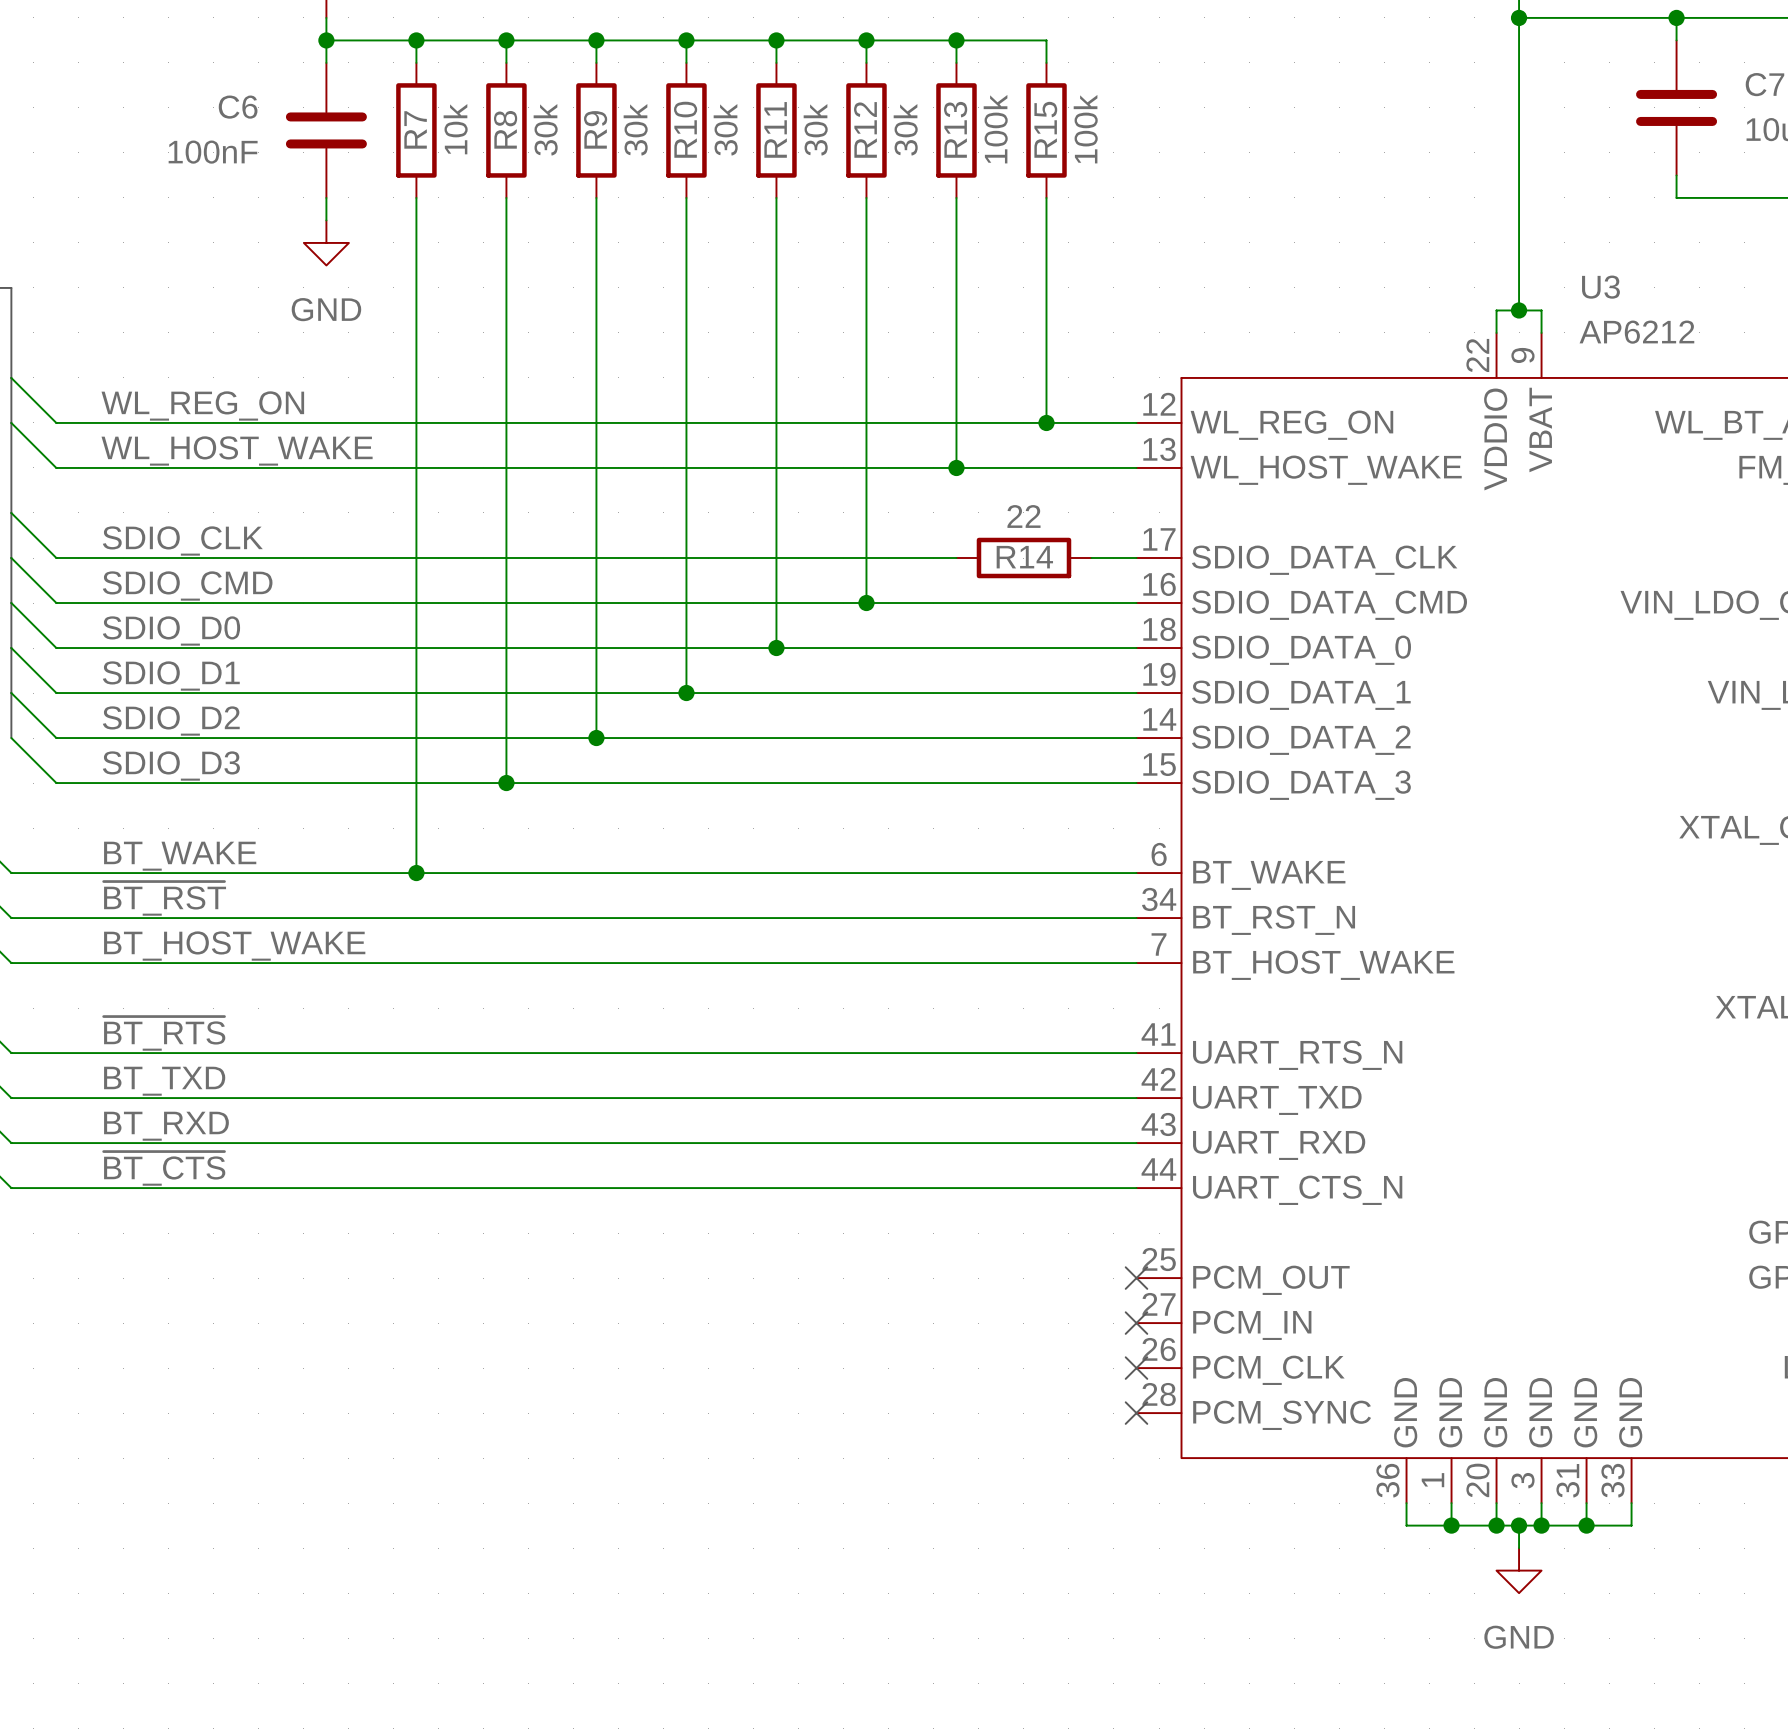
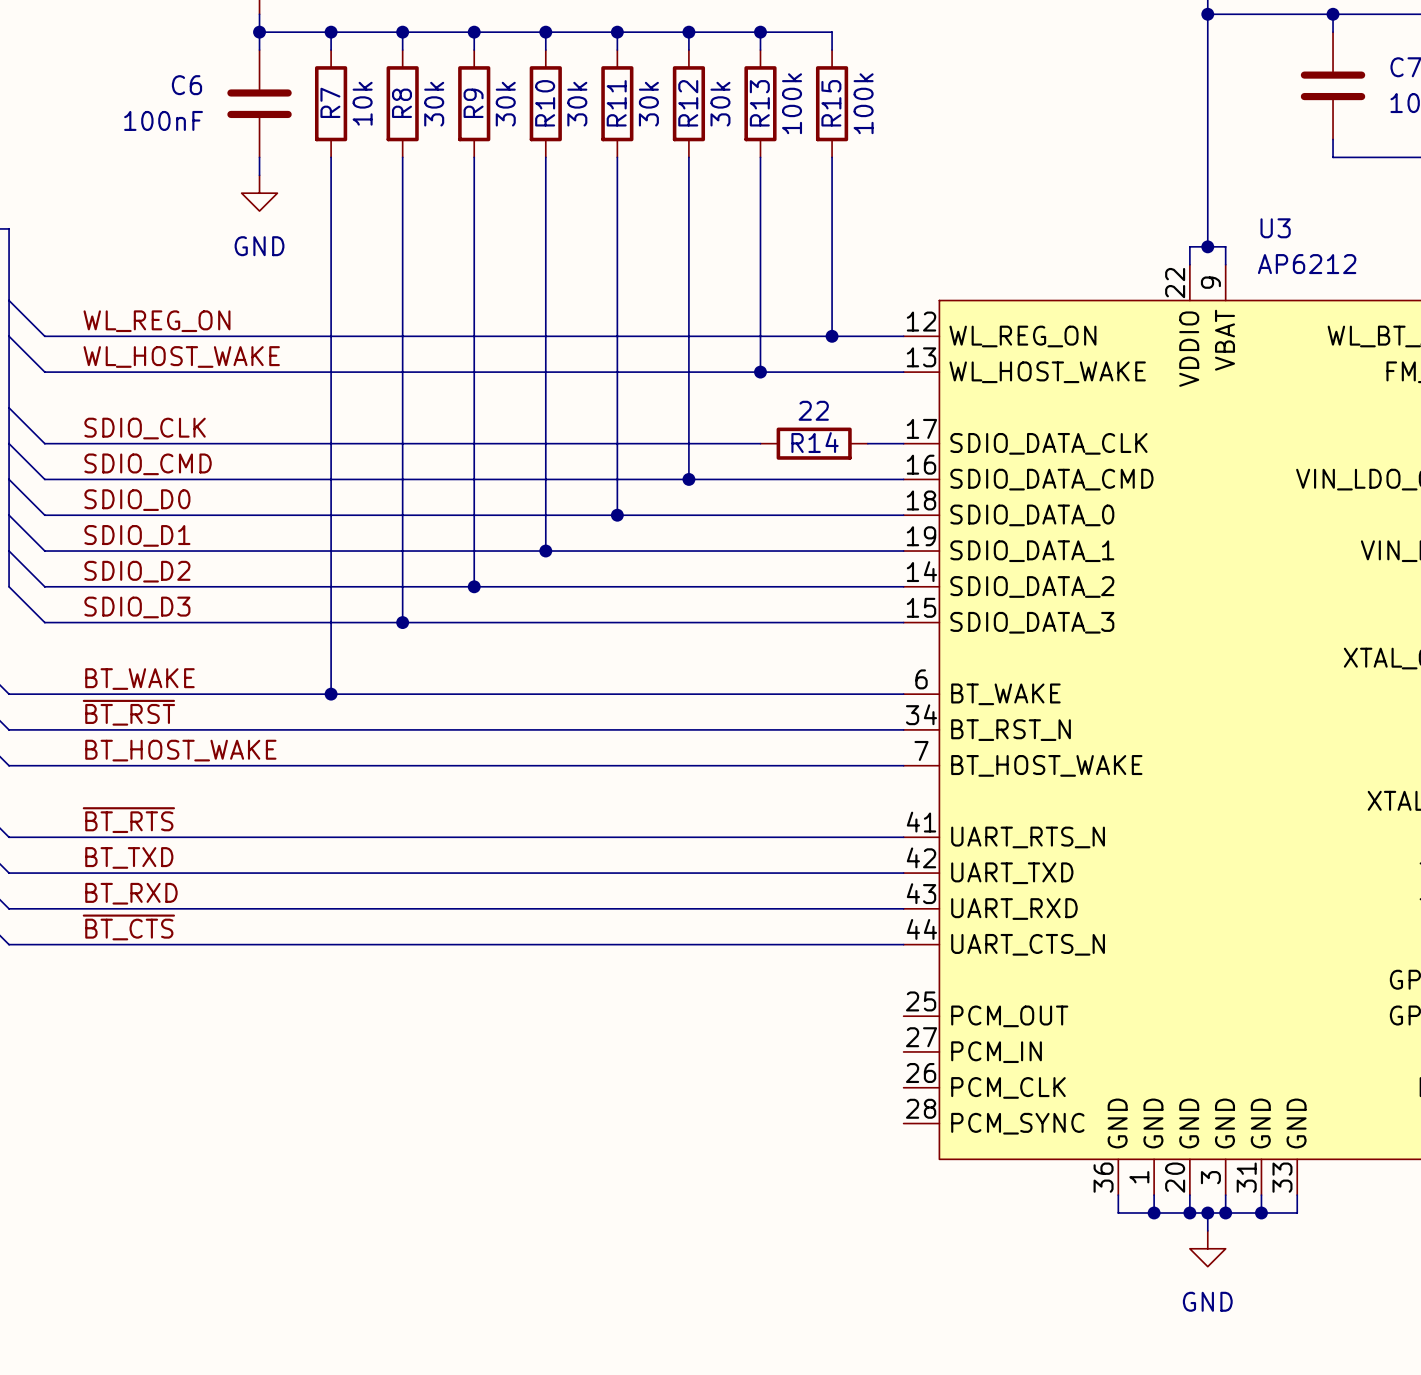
no-connect mark: (1136, 1278) -> none
no-connect mark: (1136, 1323) -> none
no-connect mark: (1136, 1368) -> none
no-connect mark: (1136, 1413) -> none

